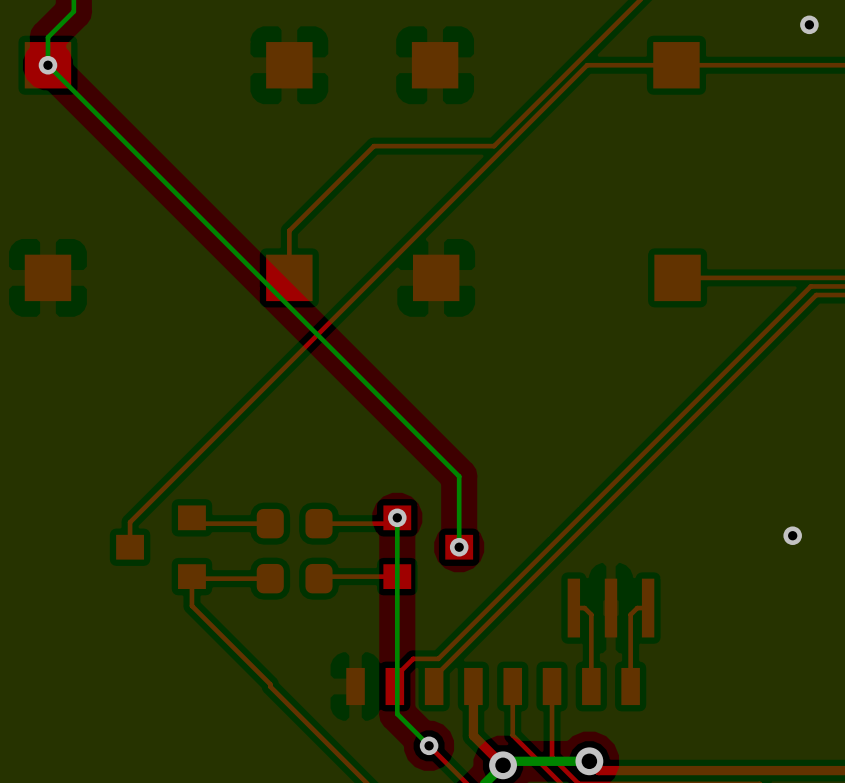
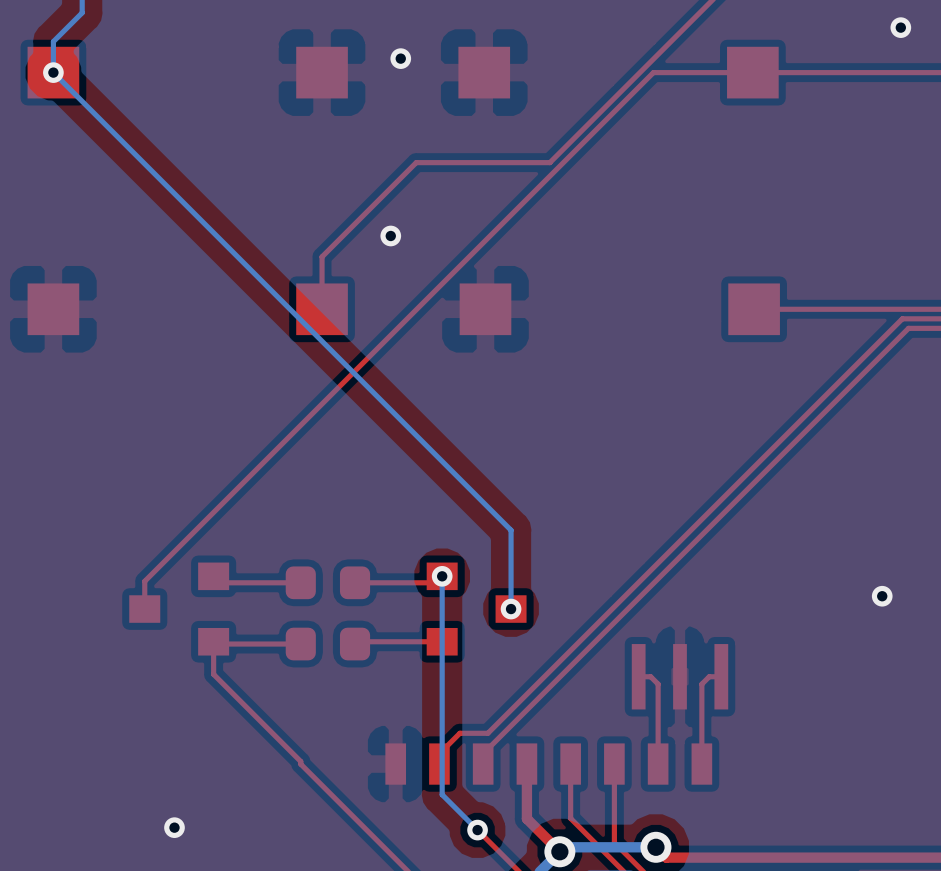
via: none -> (400, 58)
via: none -> (390, 235)
via: none -> (174, 827)

